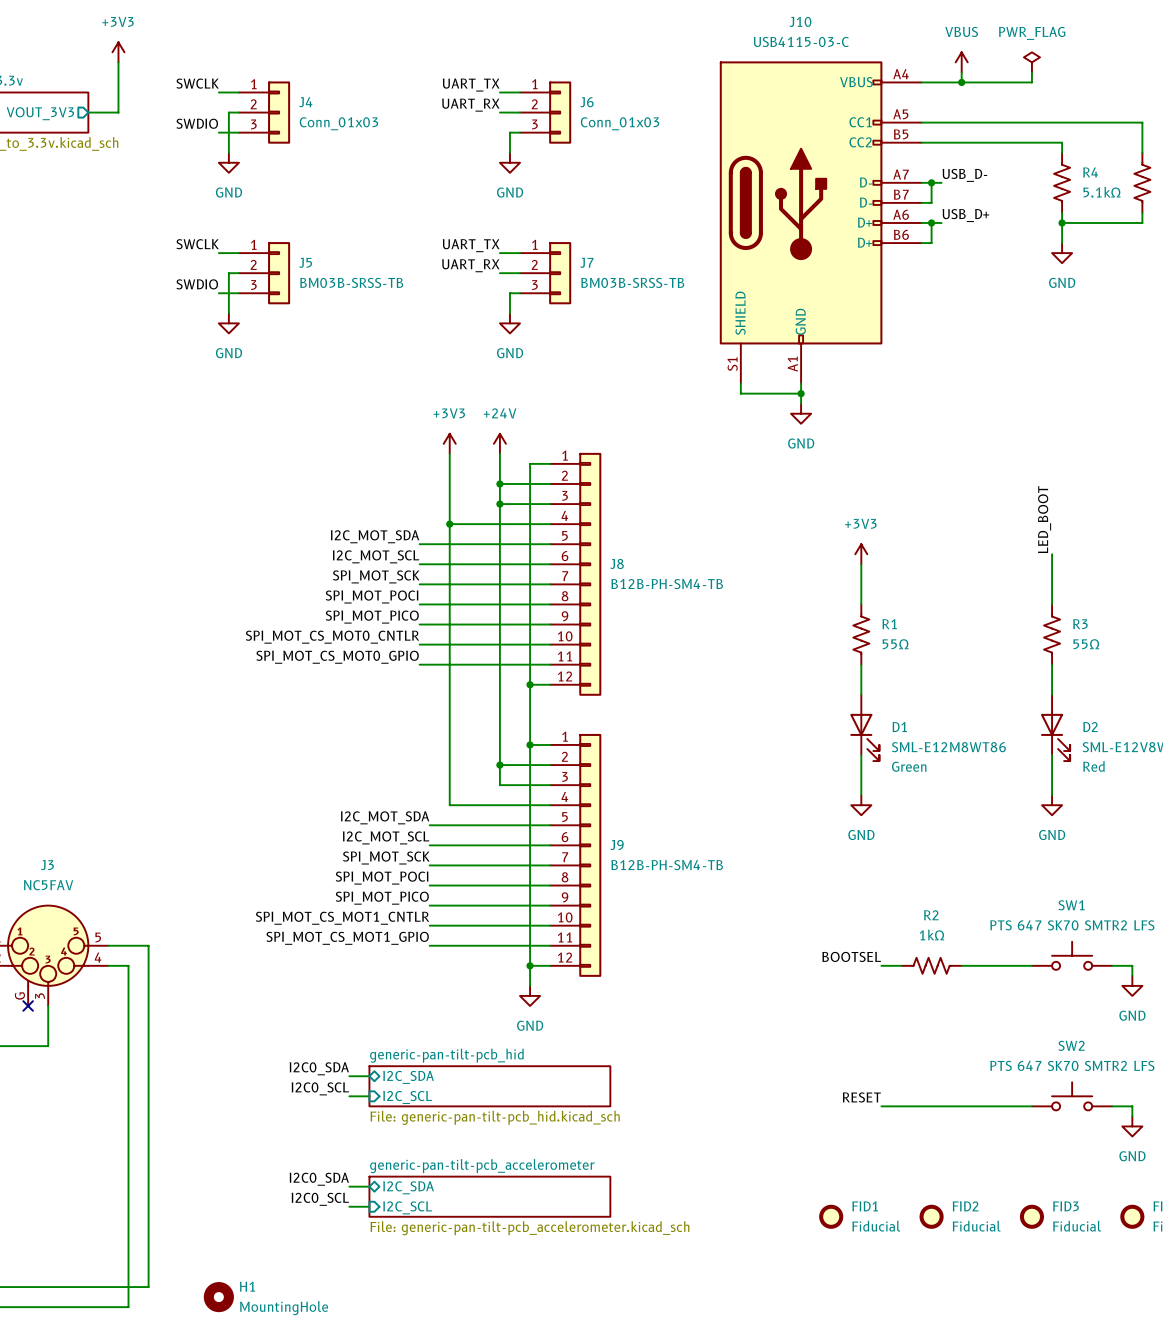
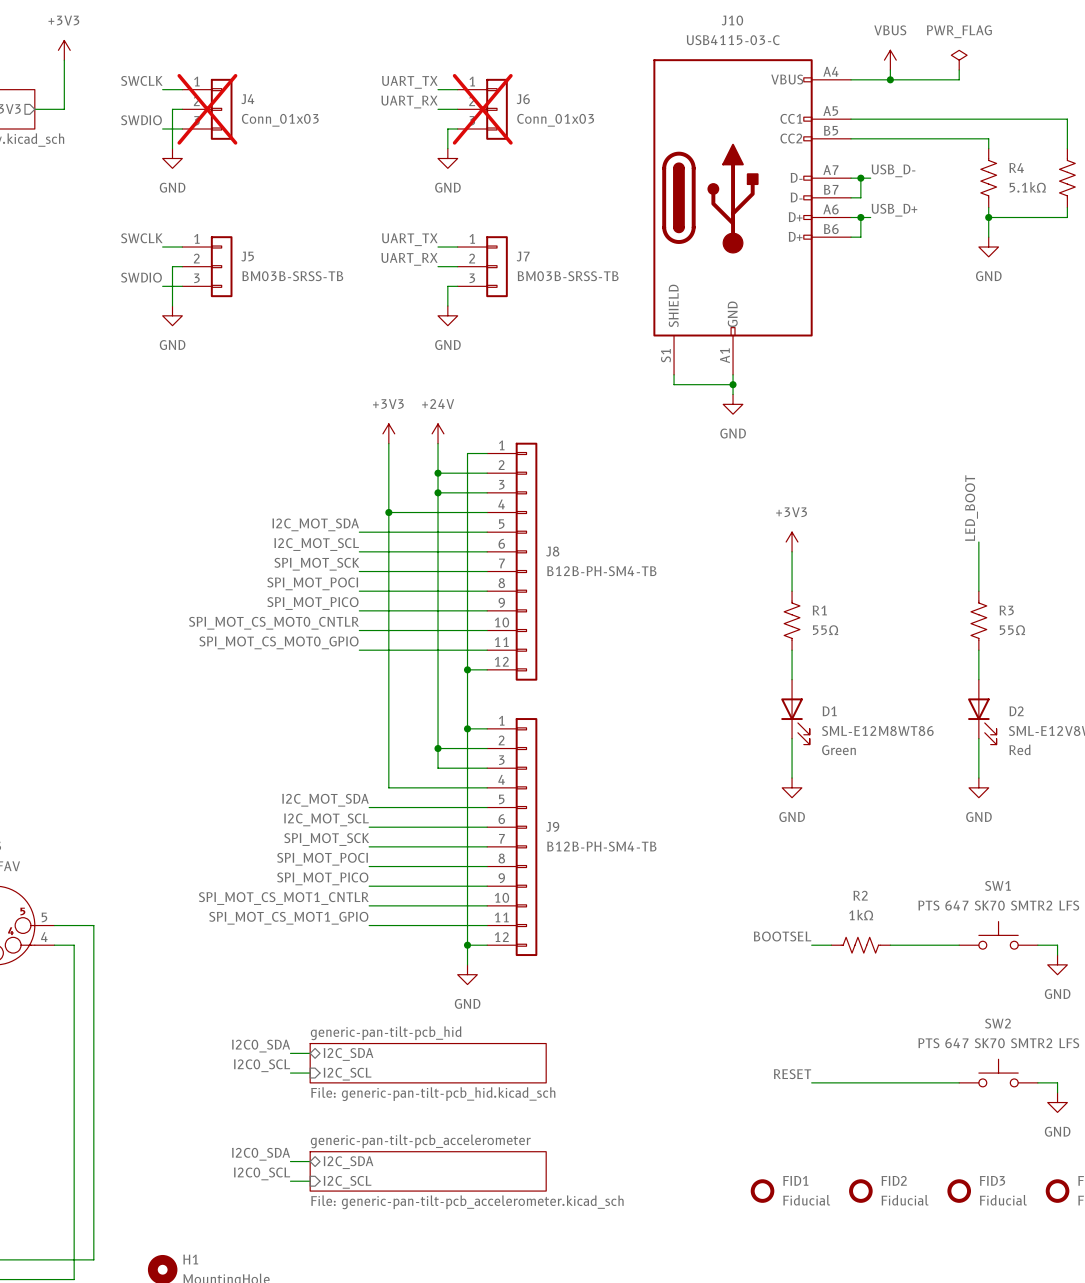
J4 do-not-place cross: none -> (207, 109)
J6 do-not-place cross: none -> (482, 109)

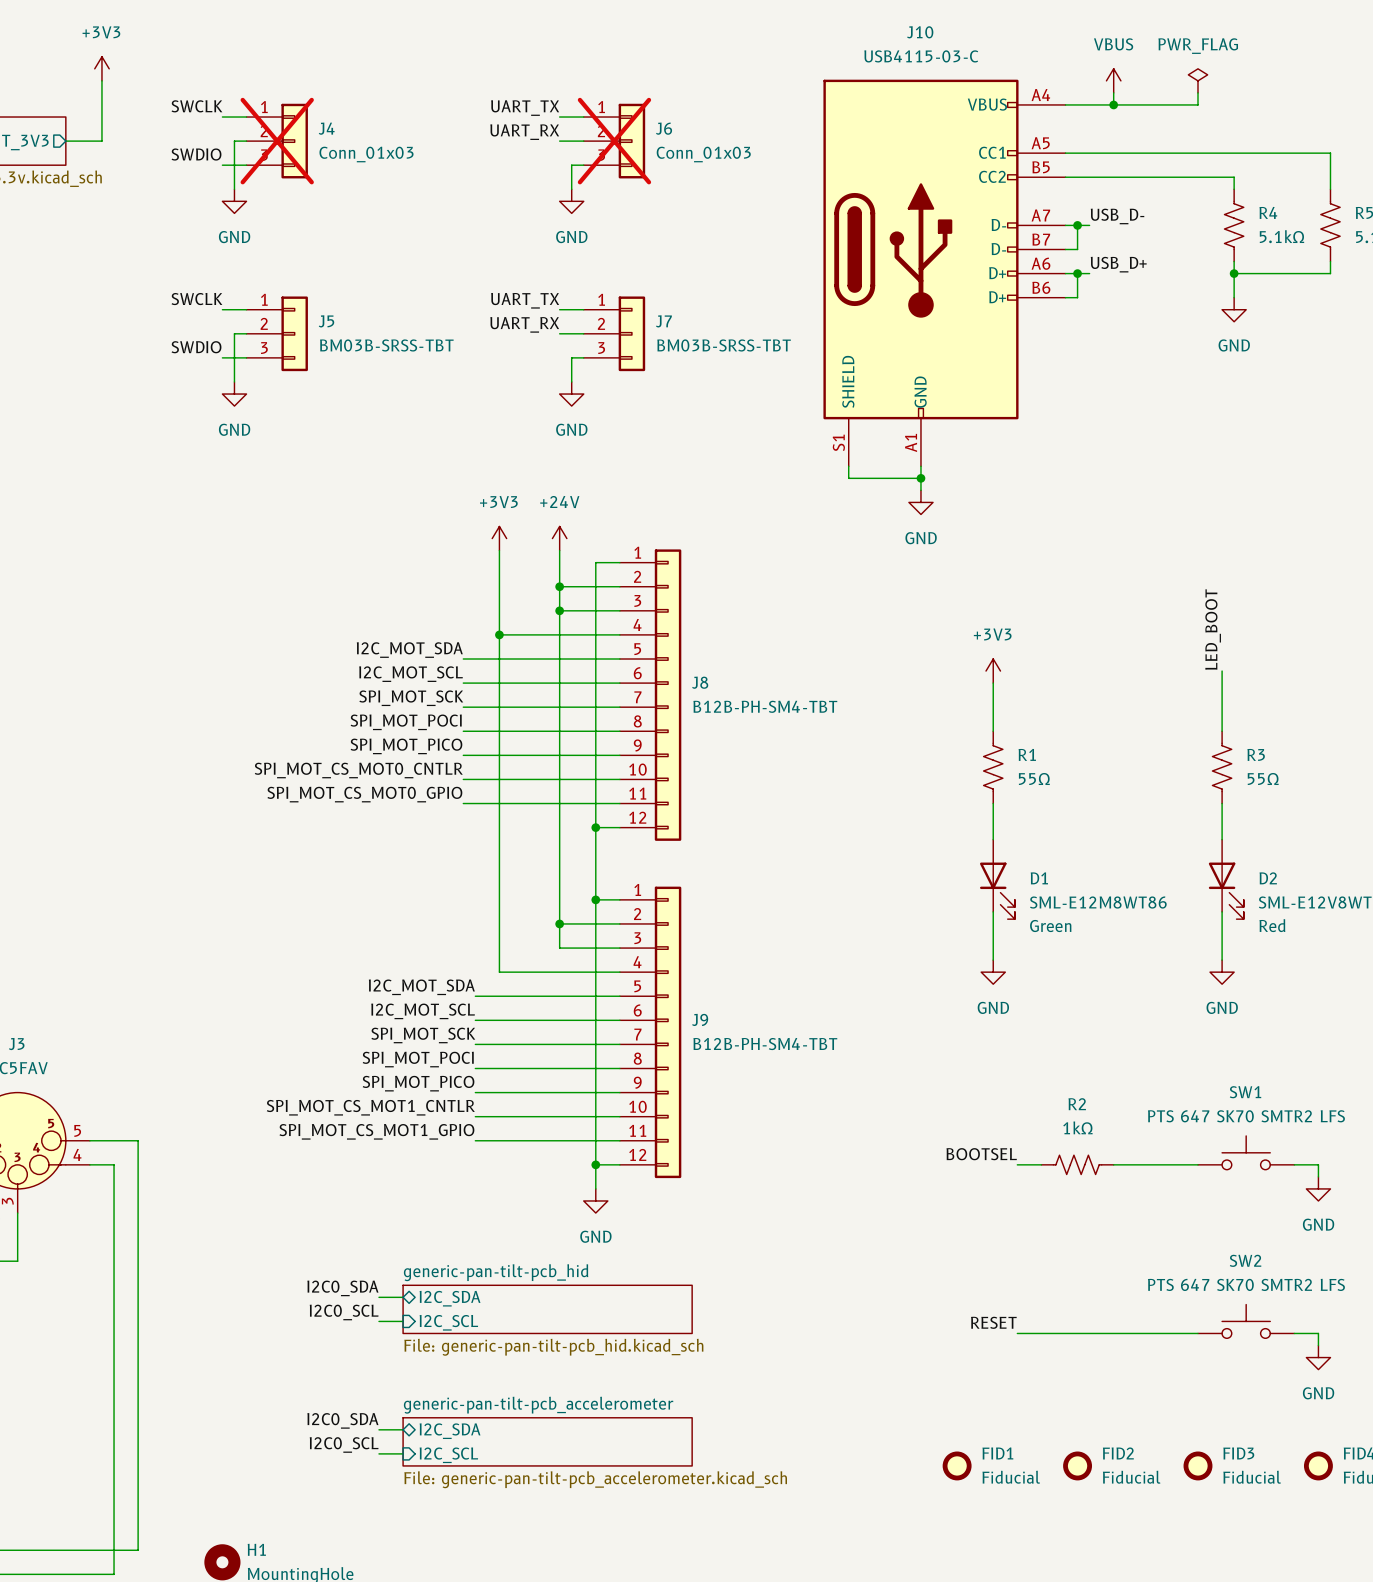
J5 value: BM03B-SRSS-TB (292, 276) -> BM03B-SRSS-TBT (386, 345)
J7 value: BM03B-SRSS-TB (568, 276) -> BM03B-SRSS-TBT (724, 345)
J8 value: B12B-PH-SM4-TB (601, 571) -> B12B-PH-SM4-TBT (765, 706)
J9 value: B12B-PH-SM4-TB (601, 846) -> B12B-PH-SM4-TBT (765, 1044)

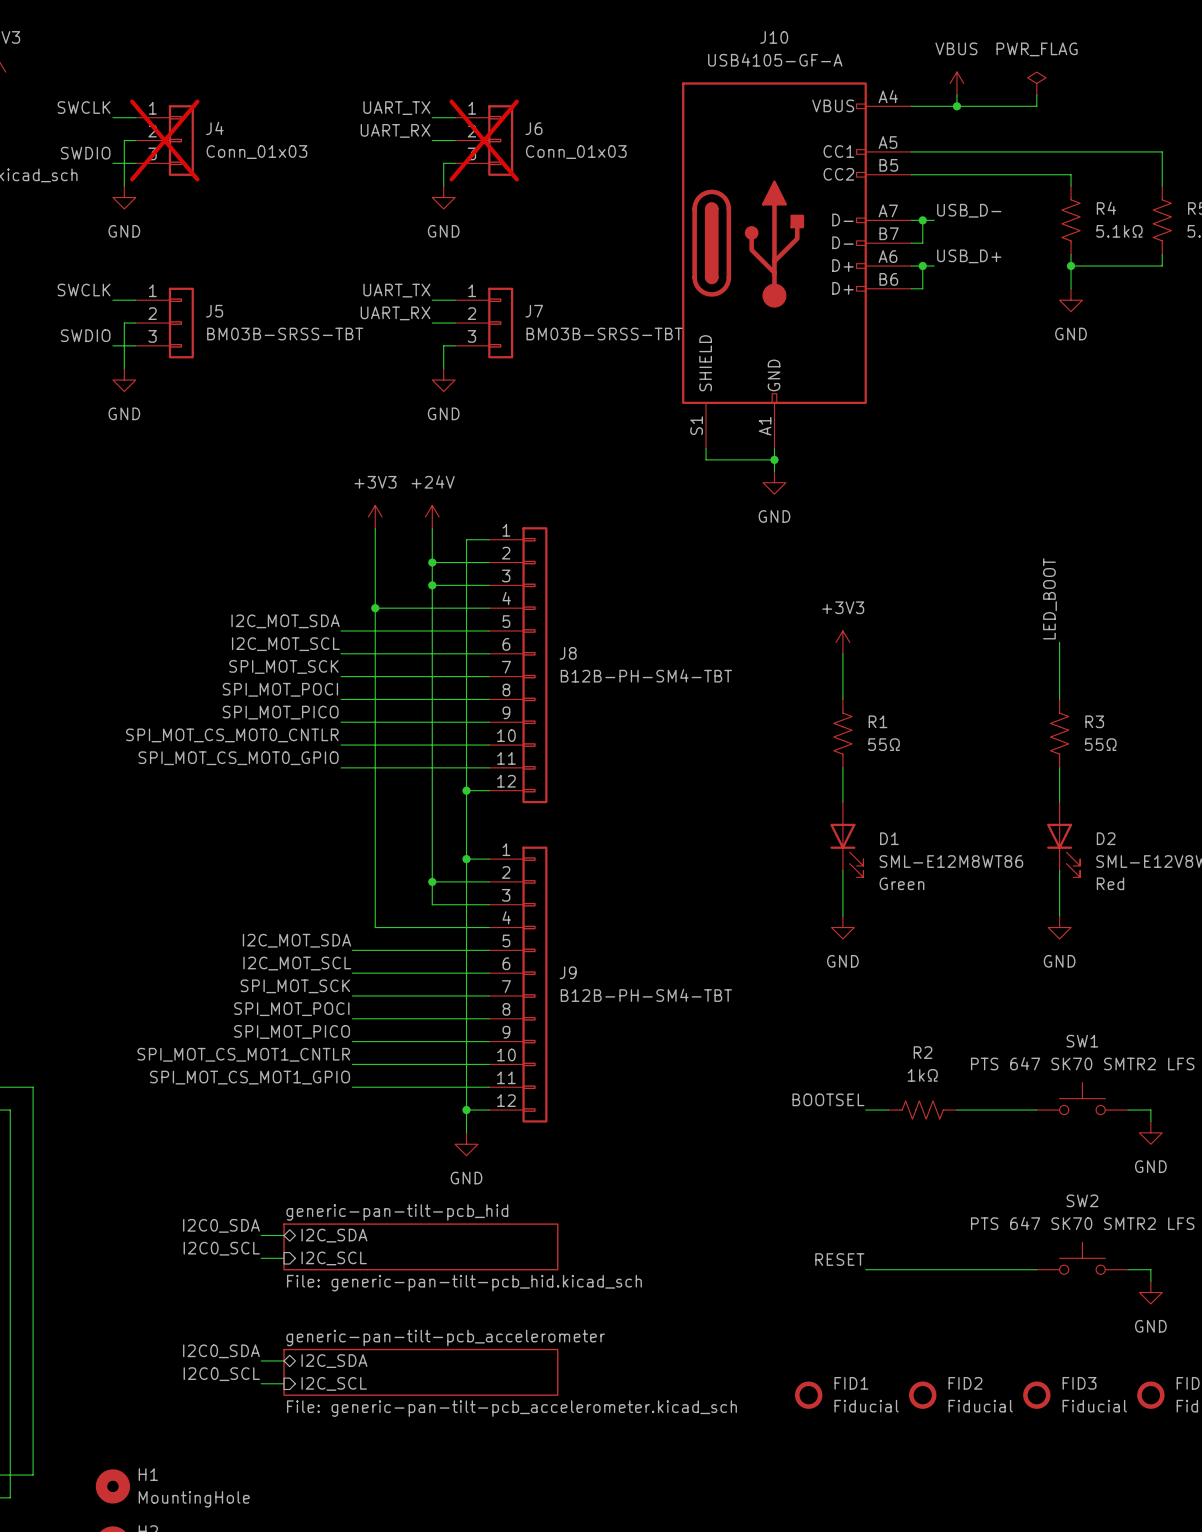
J10 value: USB4115-03-C (921, 56) -> USB4105-GF-A (775, 59)

